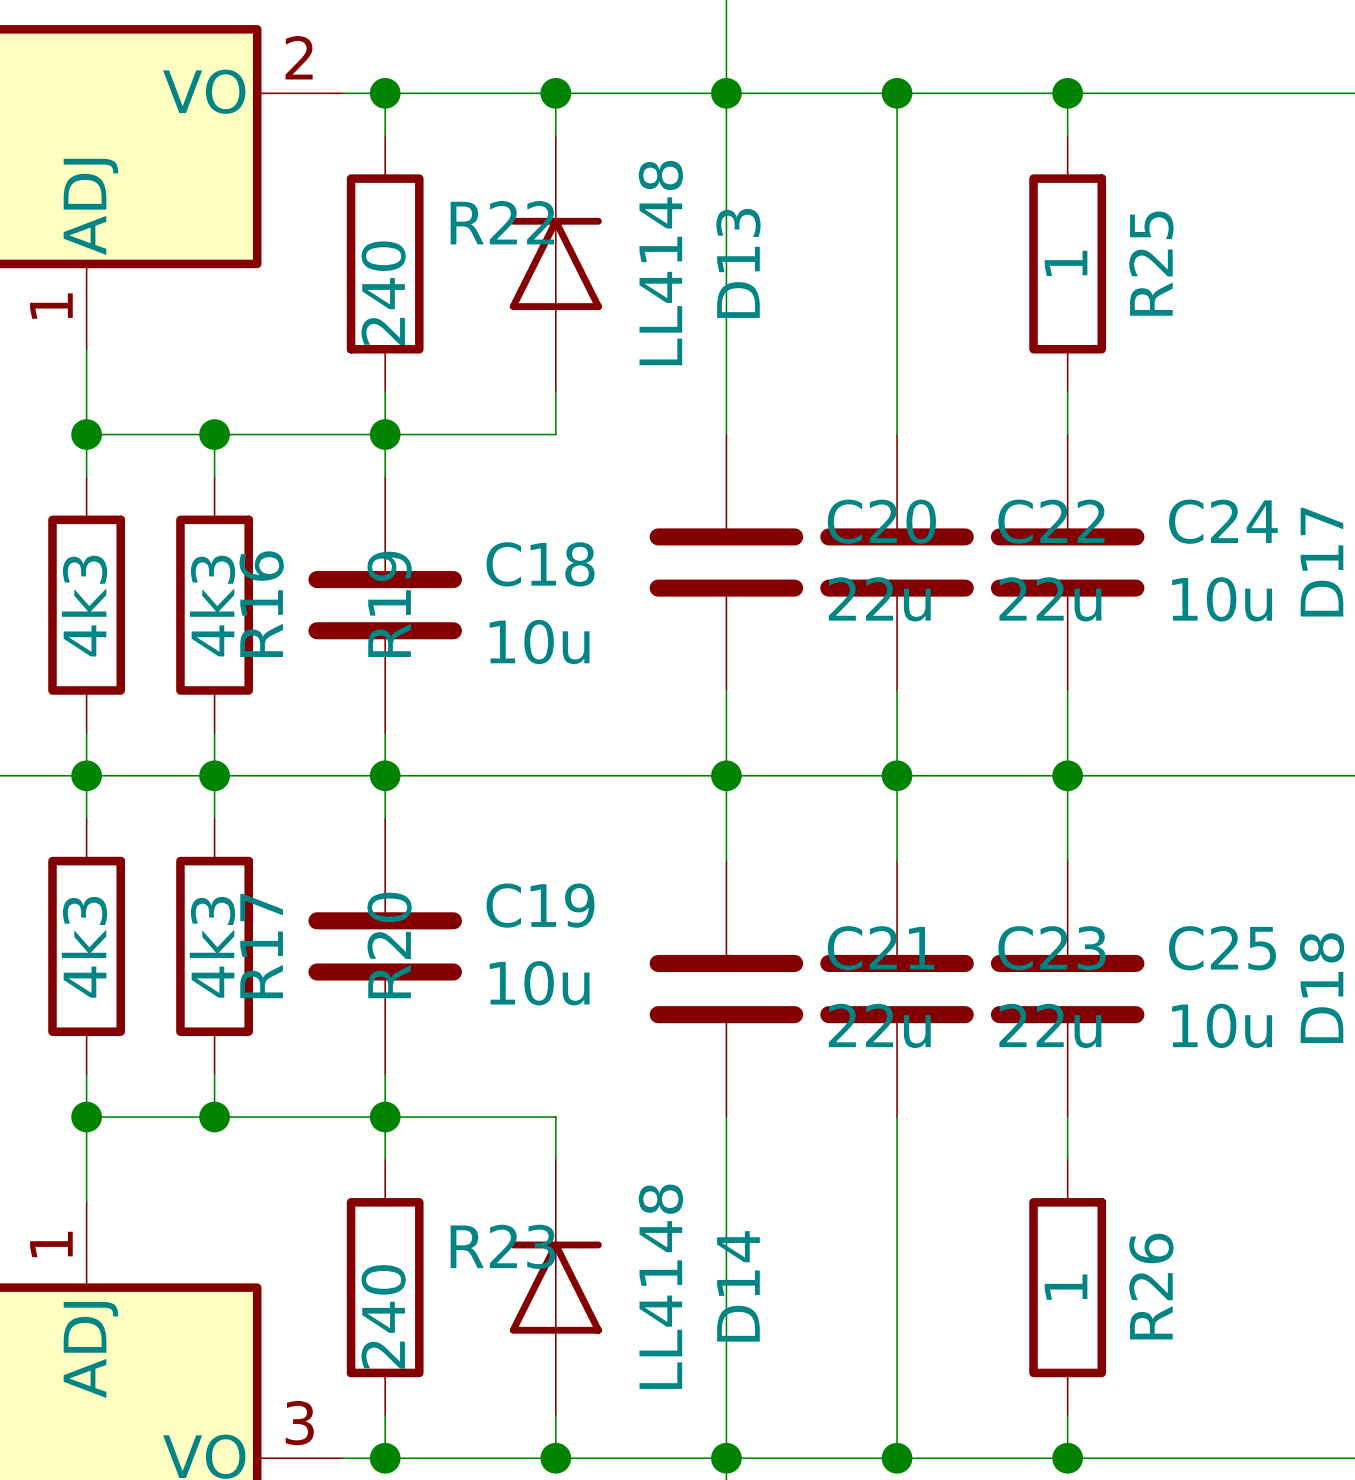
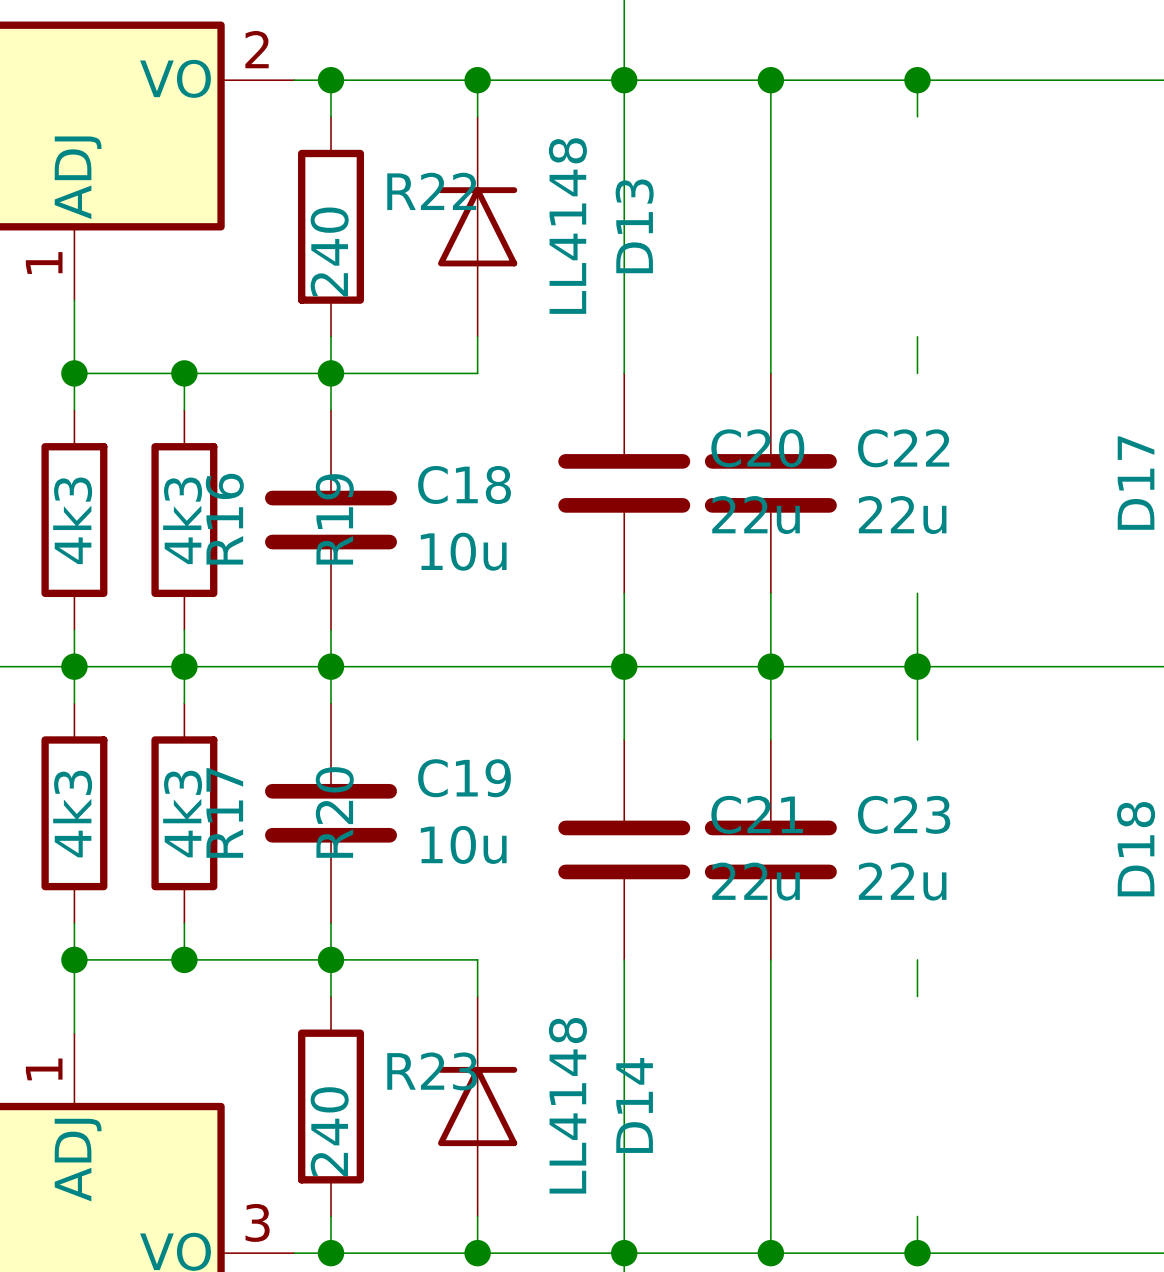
R25: 1 (1067, 263) -> none
C24: 10u (1067, 562) -> none
C25: 10u (1067, 989) -> none
R26: 1 (1067, 1287) -> none

